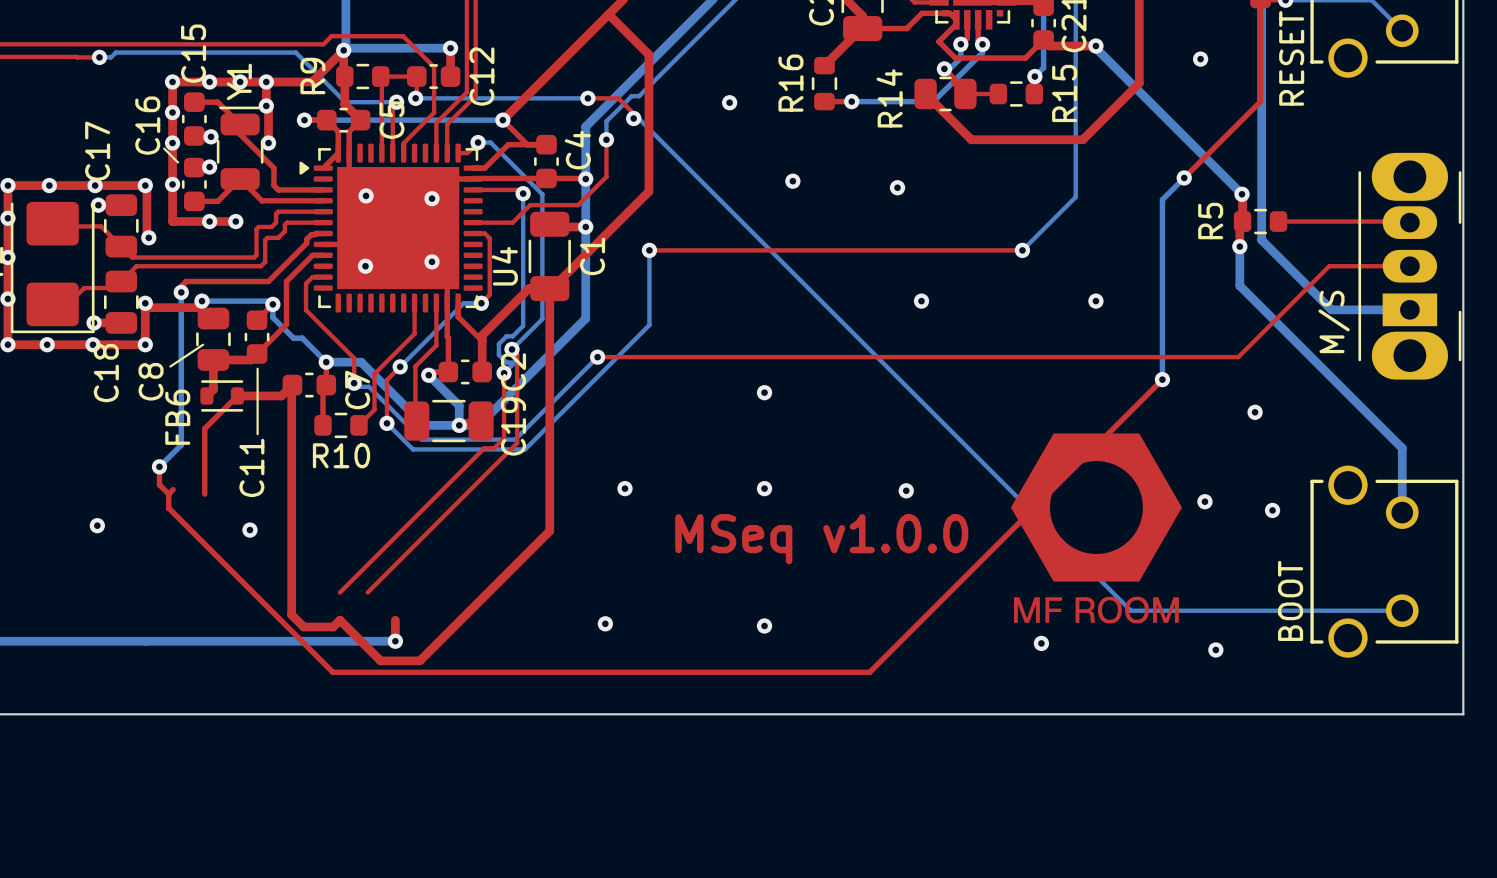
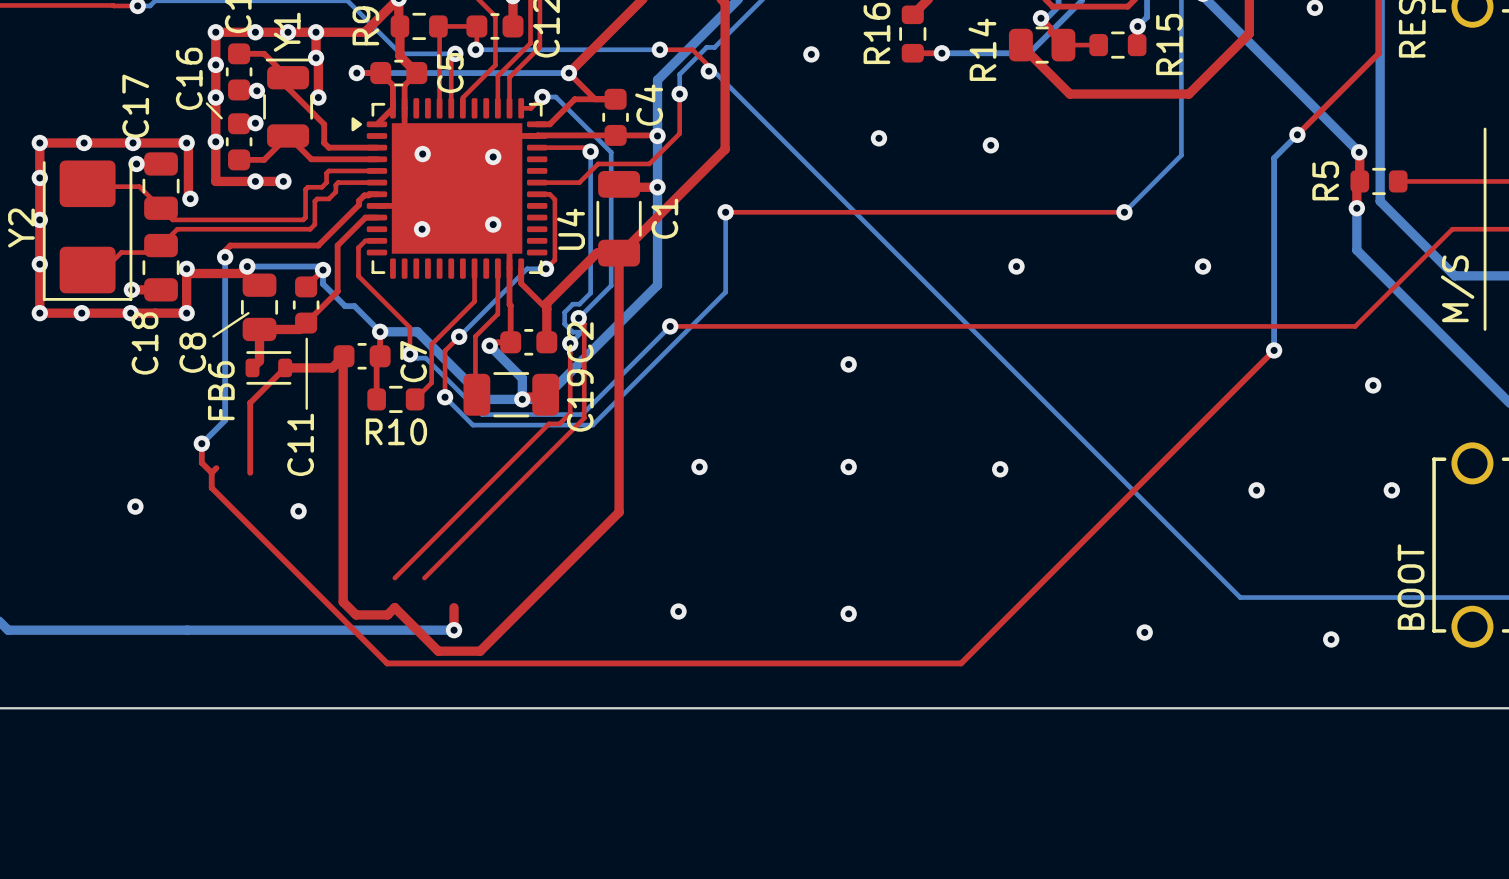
drawing: [1010, 433, 1182, 624] -> none
via position: (1204, 501) -> (1256, 490)
text: MSeq v1.0.0 (821, 539) -> none

